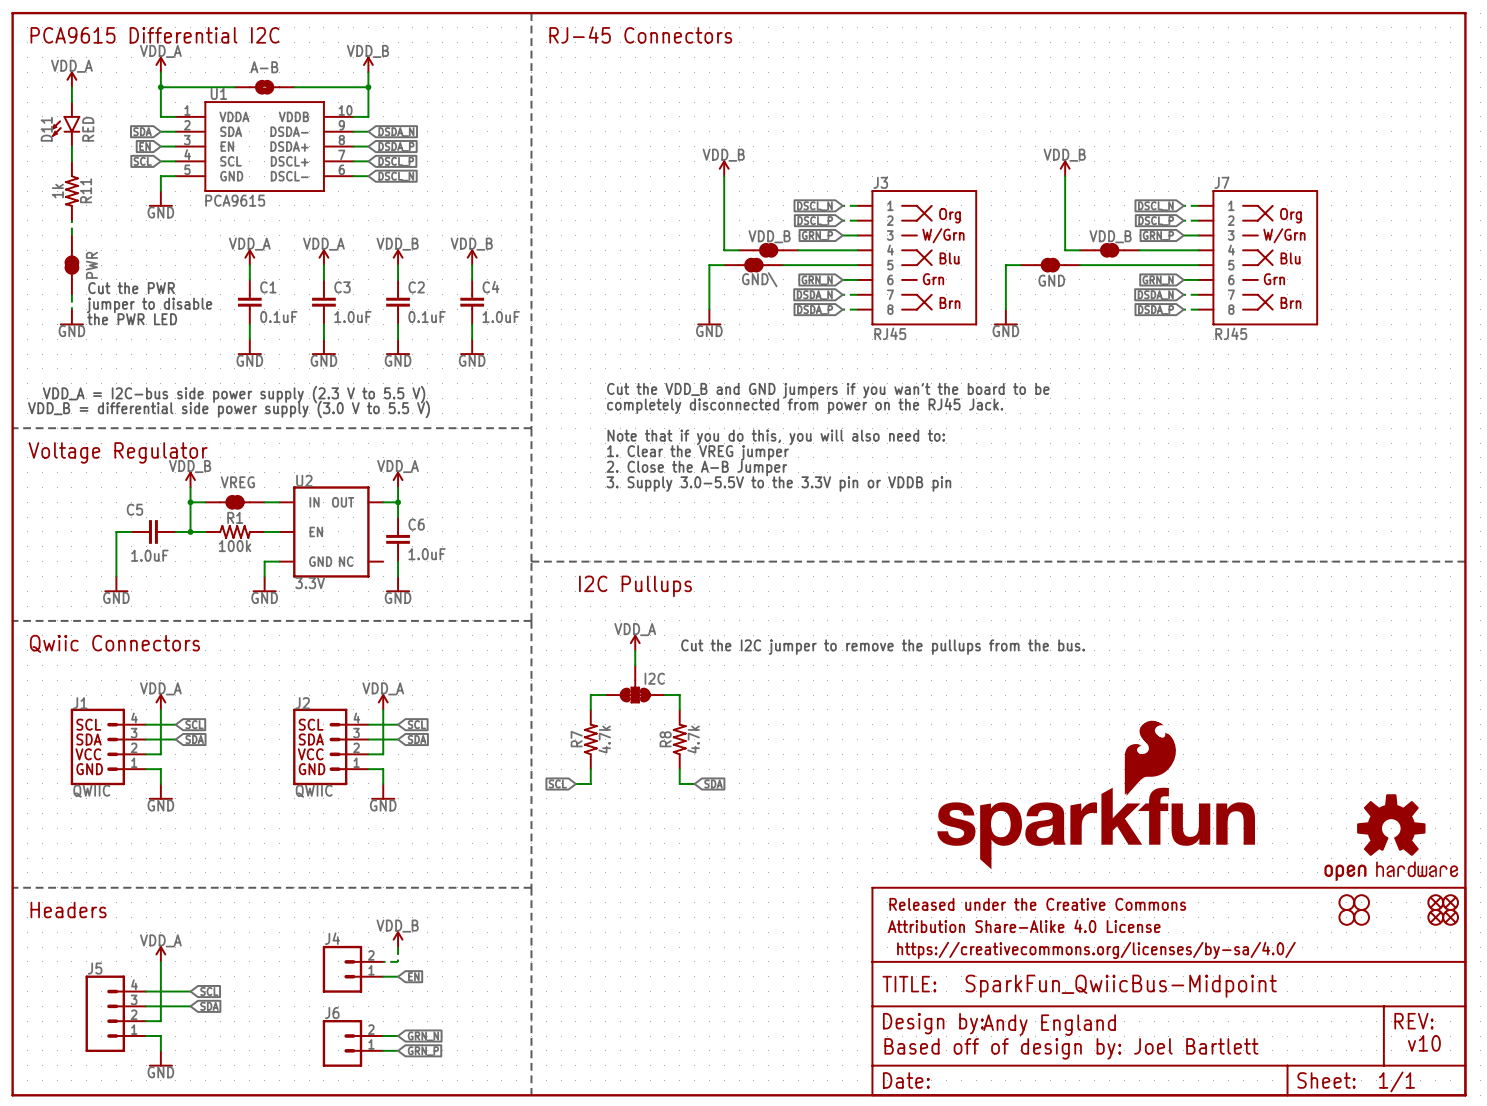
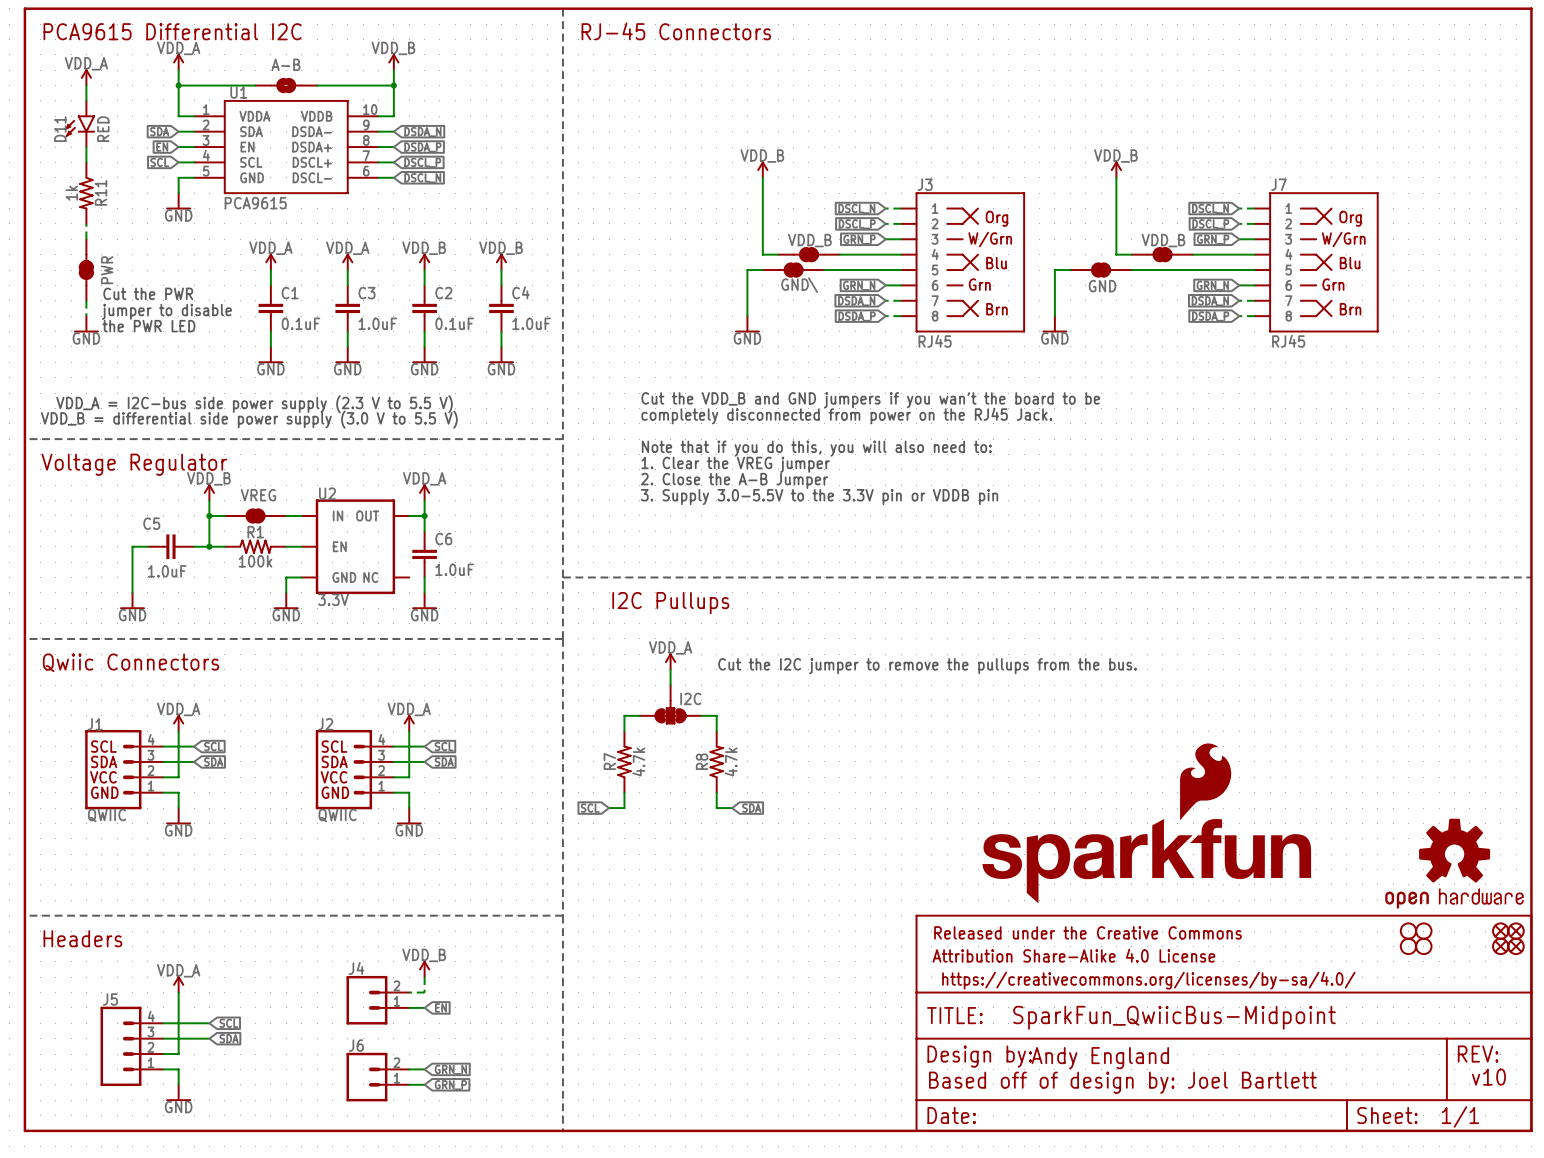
part: (1096, 795) -> none
part: none -> (1146, 861)

